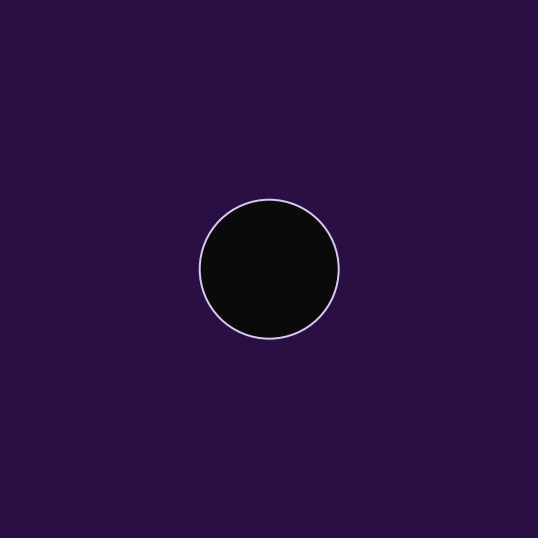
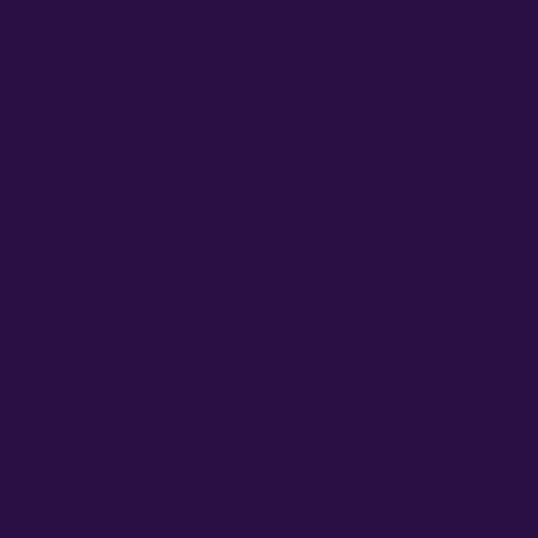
part: (269, 269) -> none

